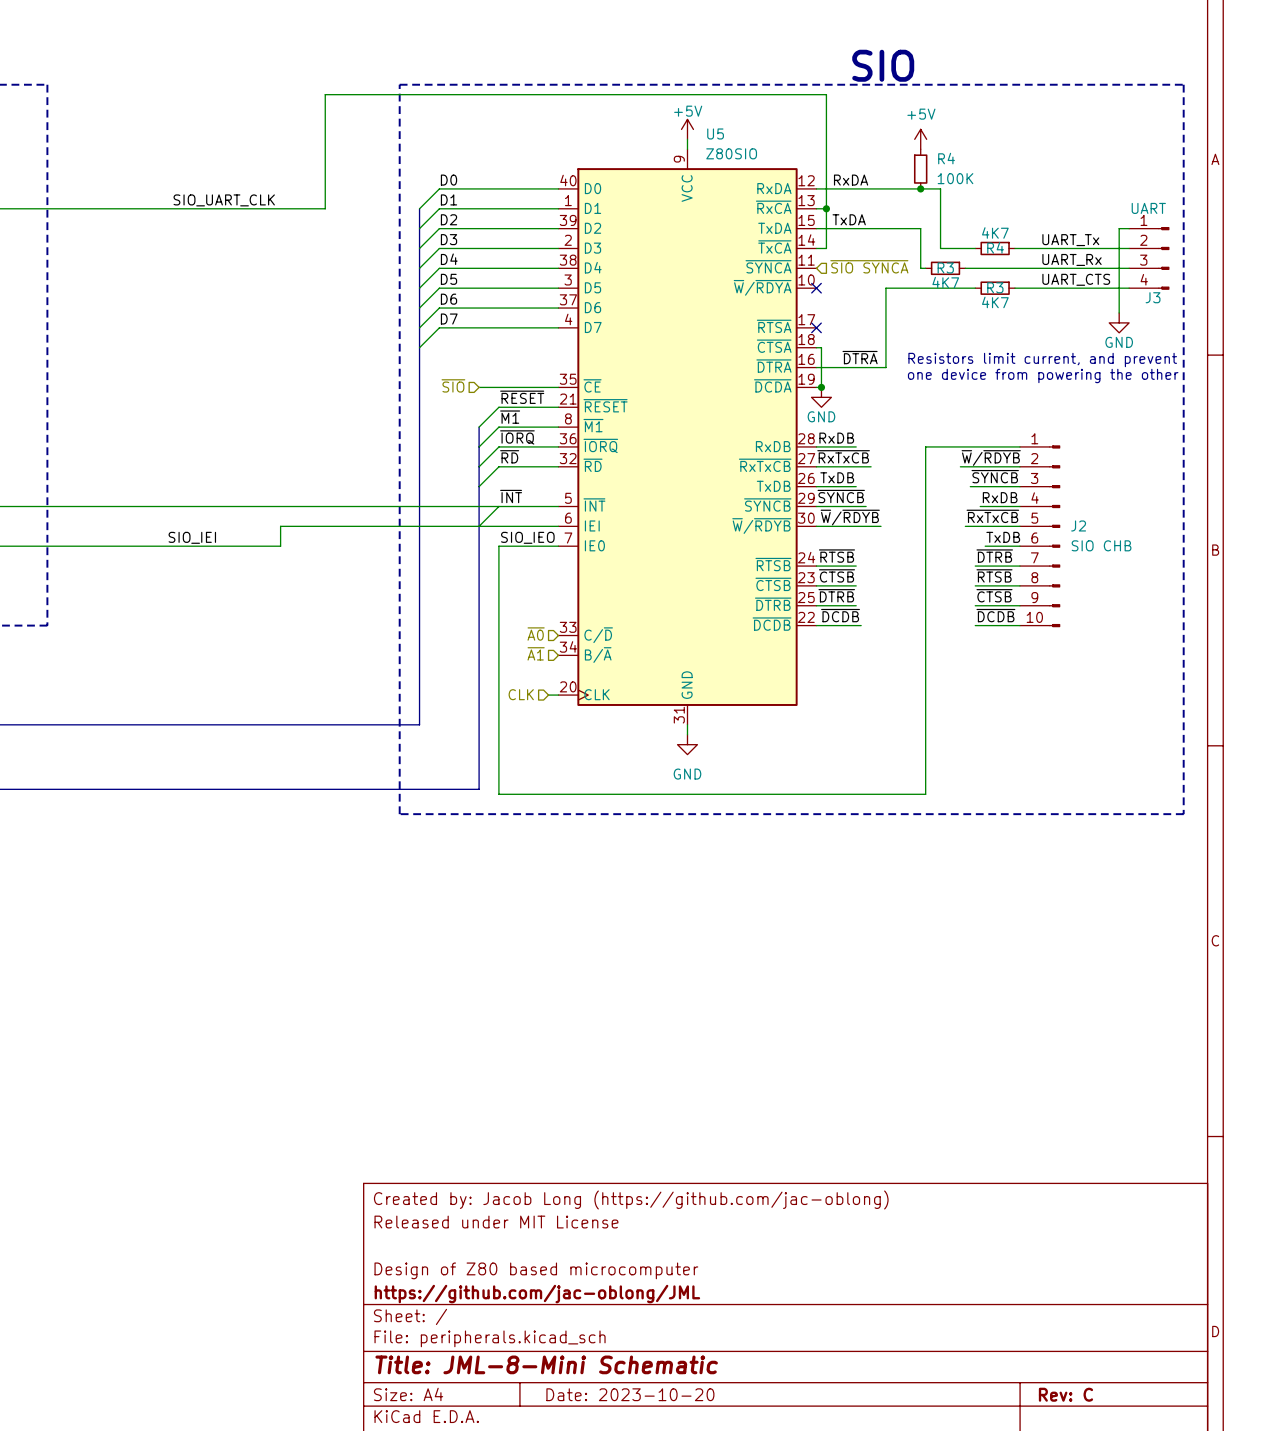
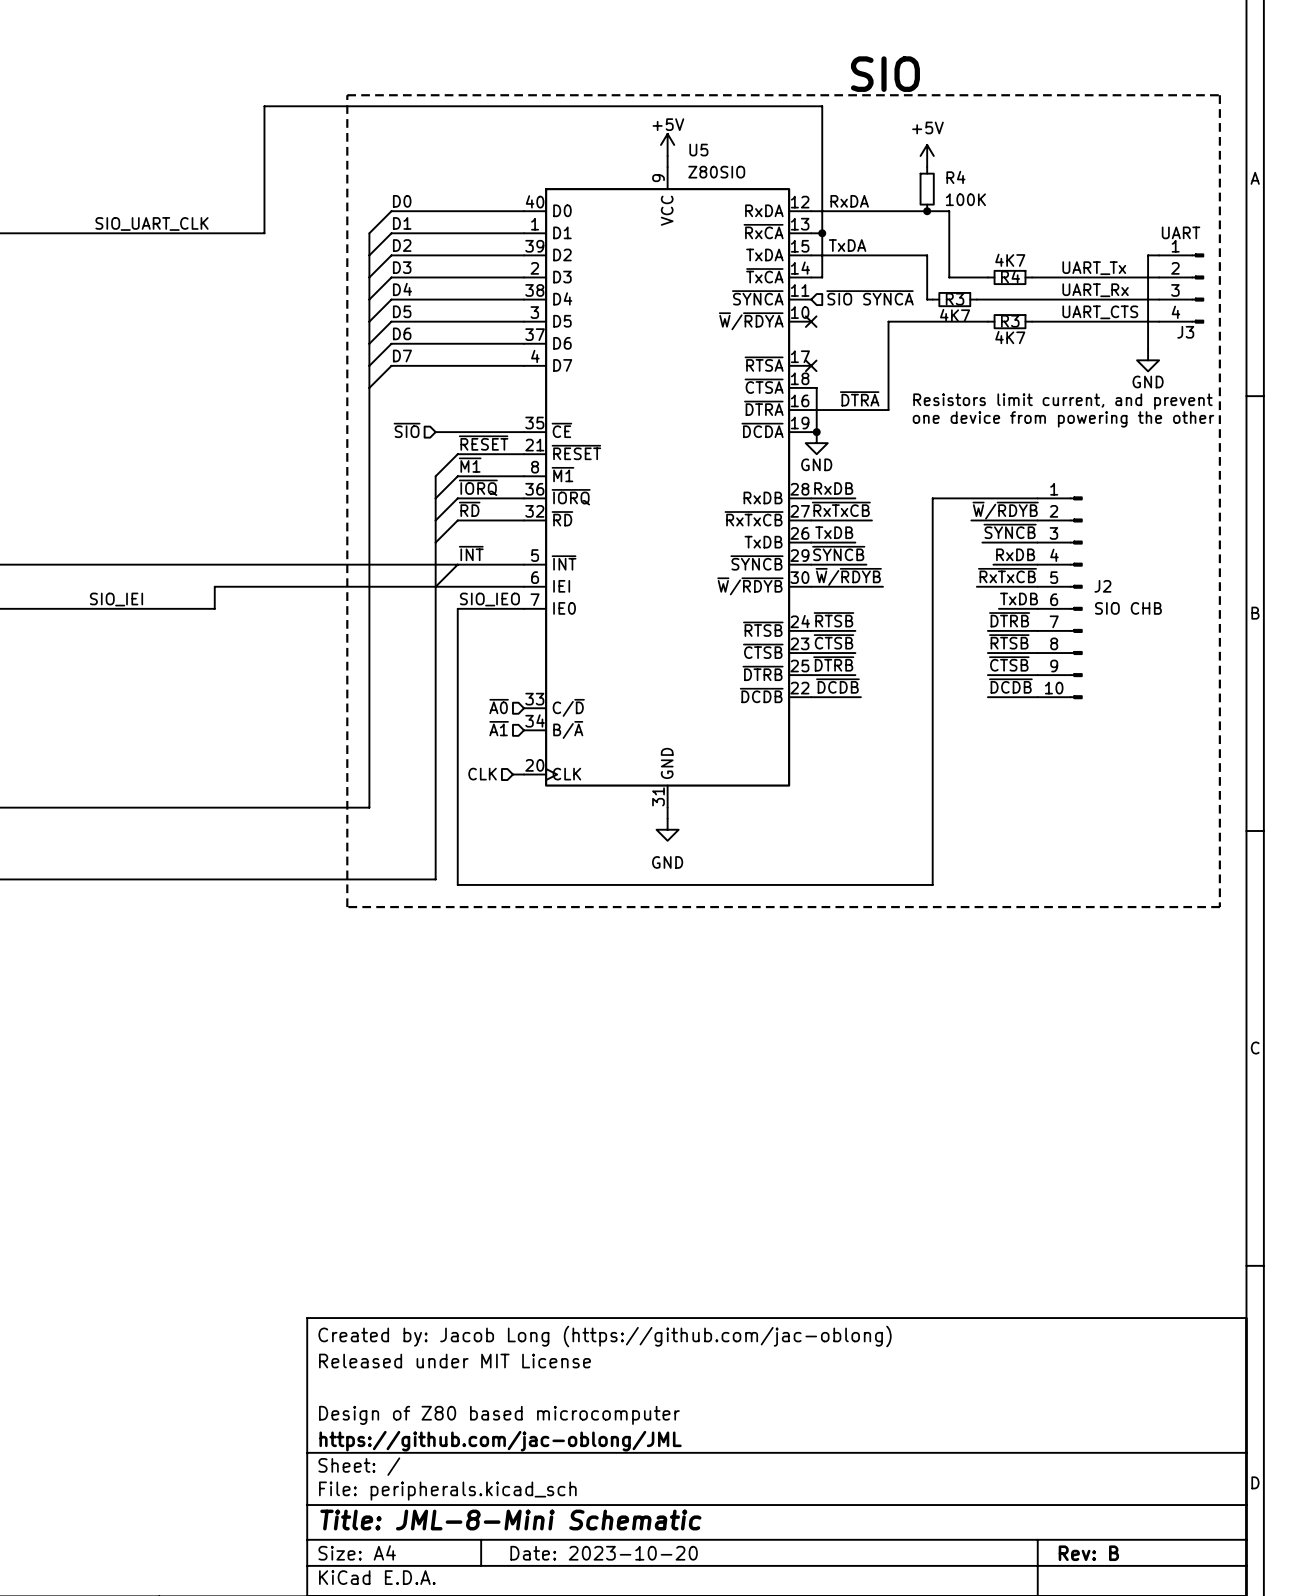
title block: Rev: C (1065, 1394) -> Rev: B (1088, 1553)

